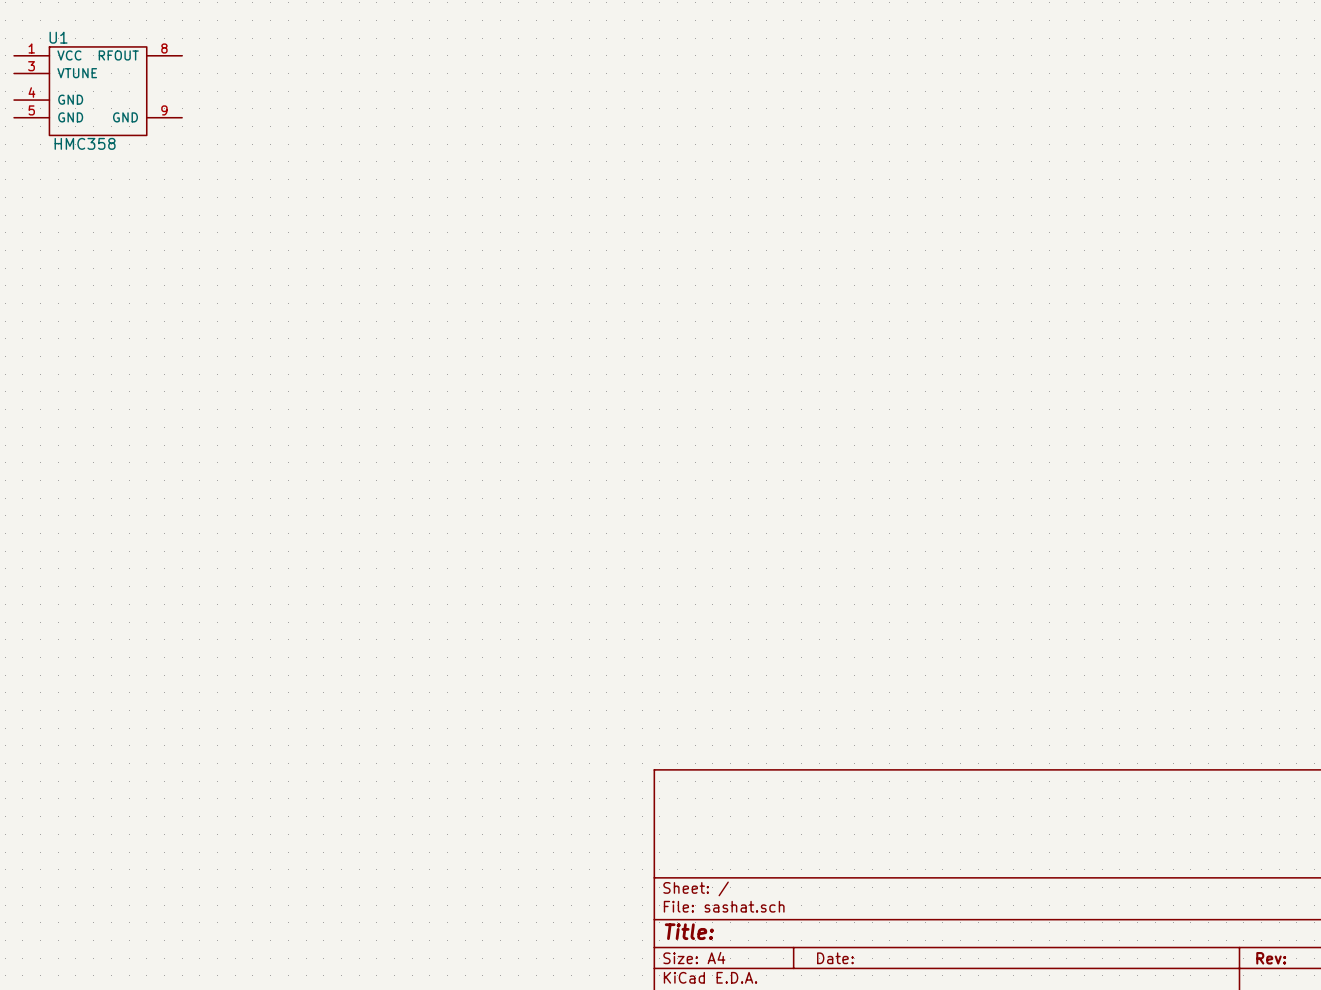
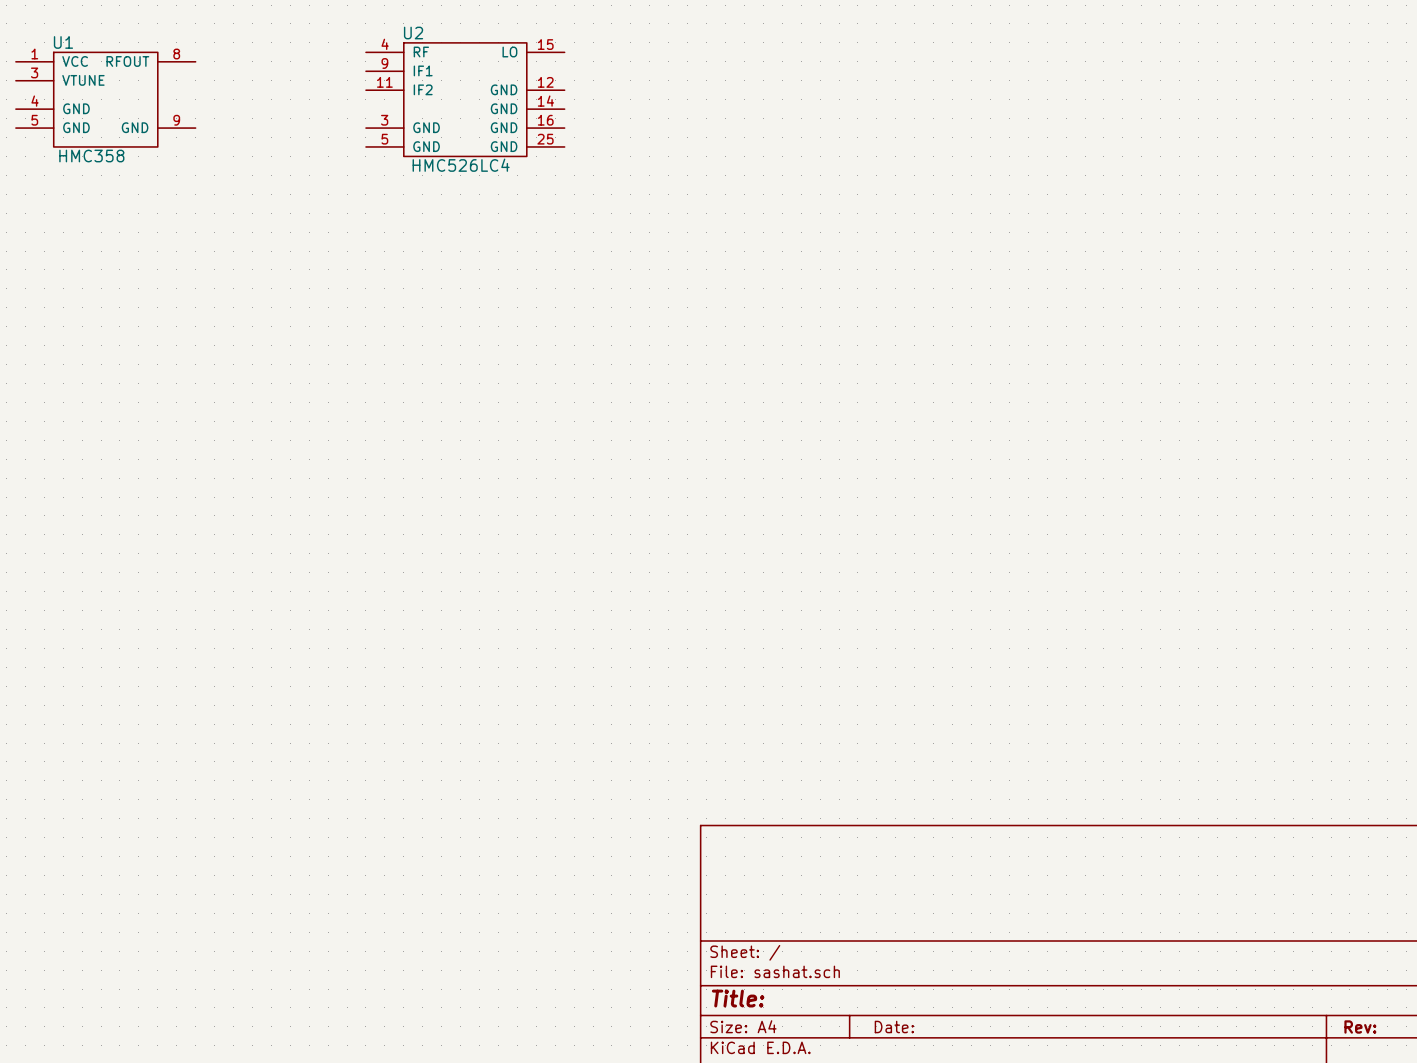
U2: none -> HMC526LC4 (465, 99)

